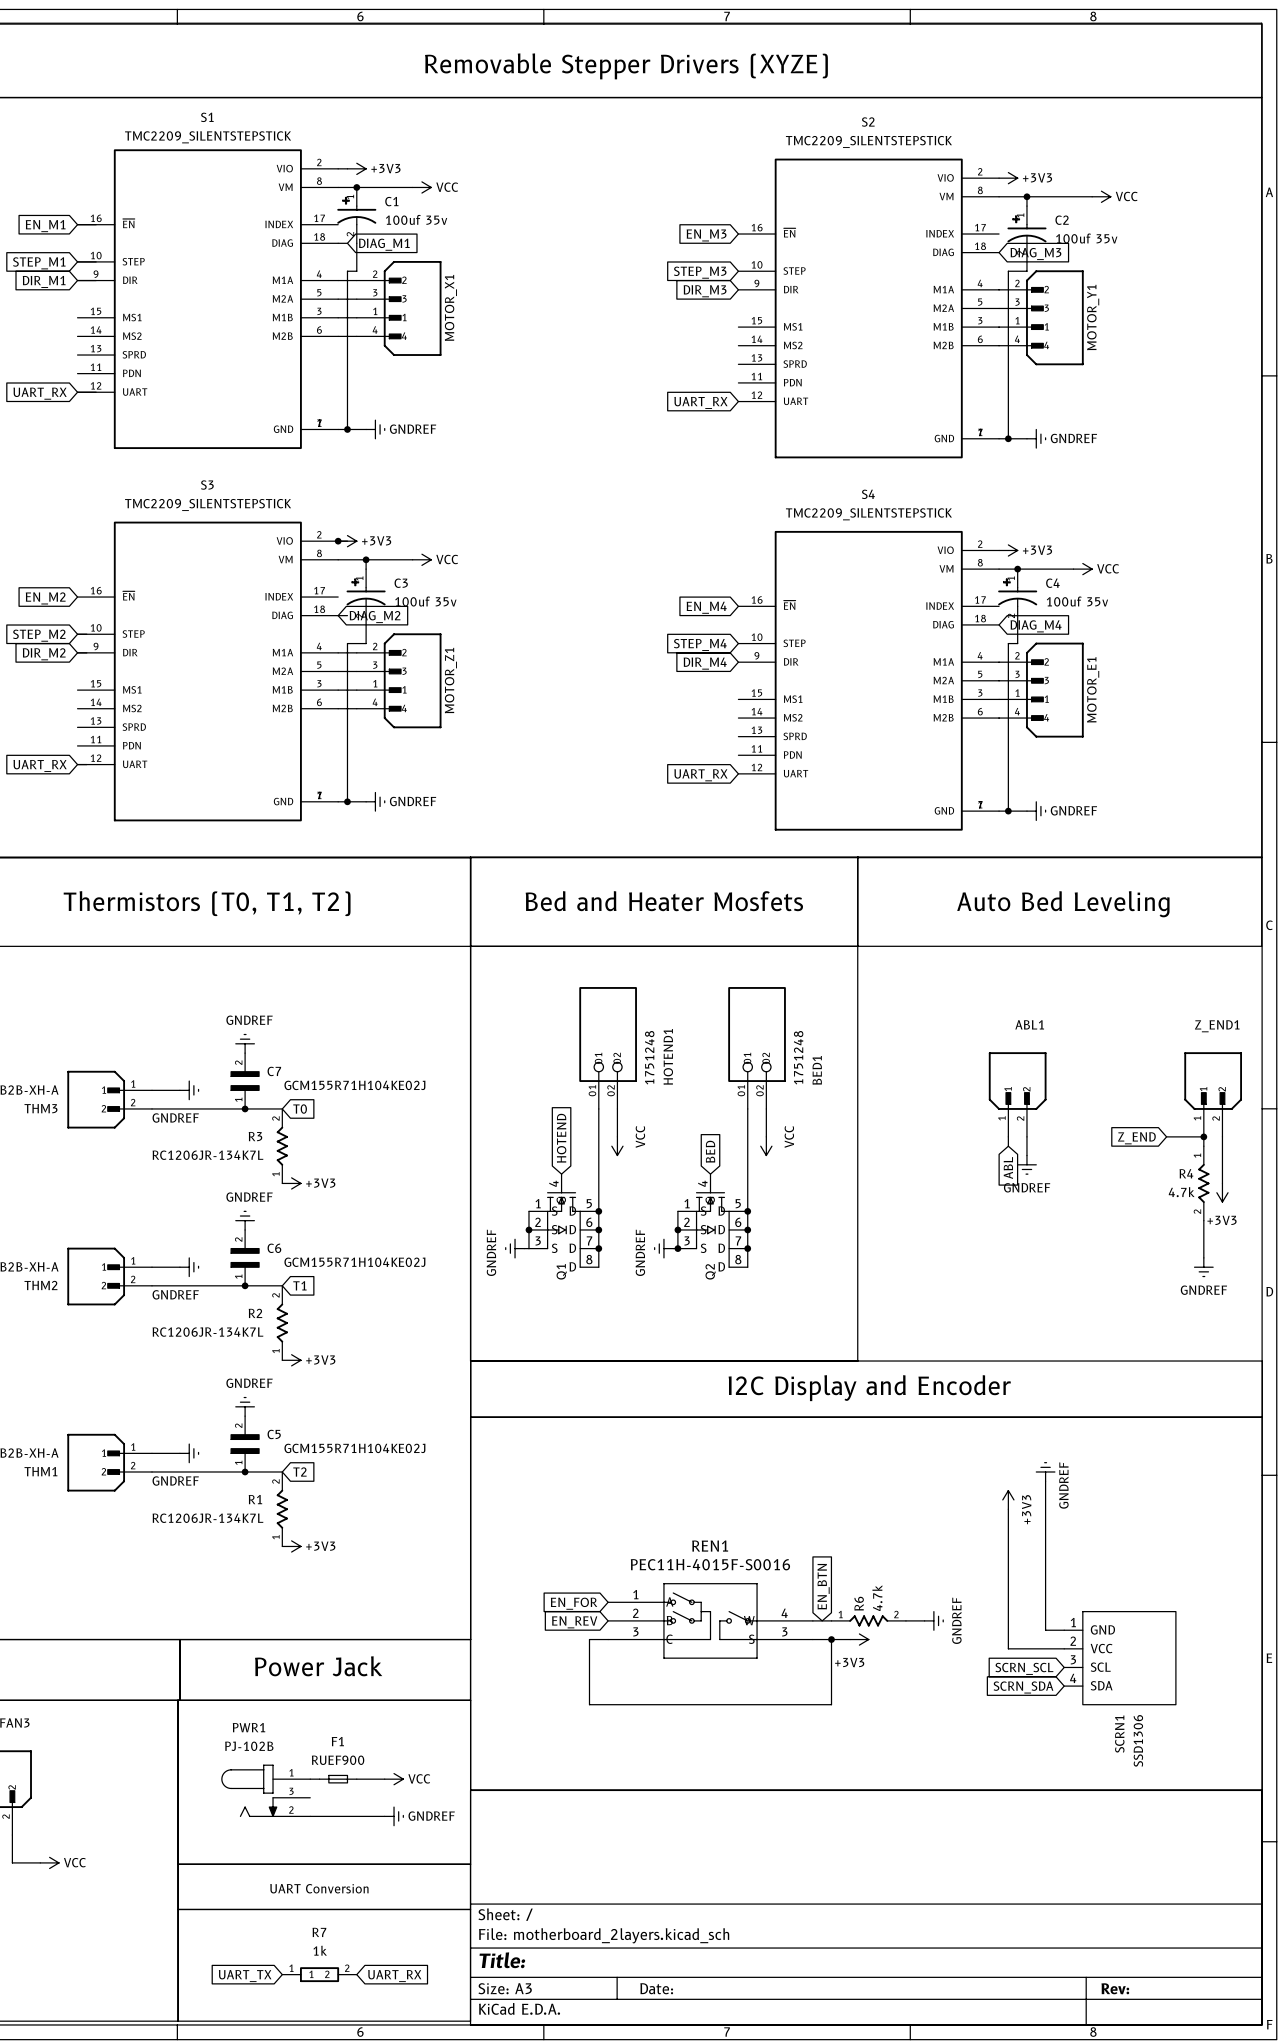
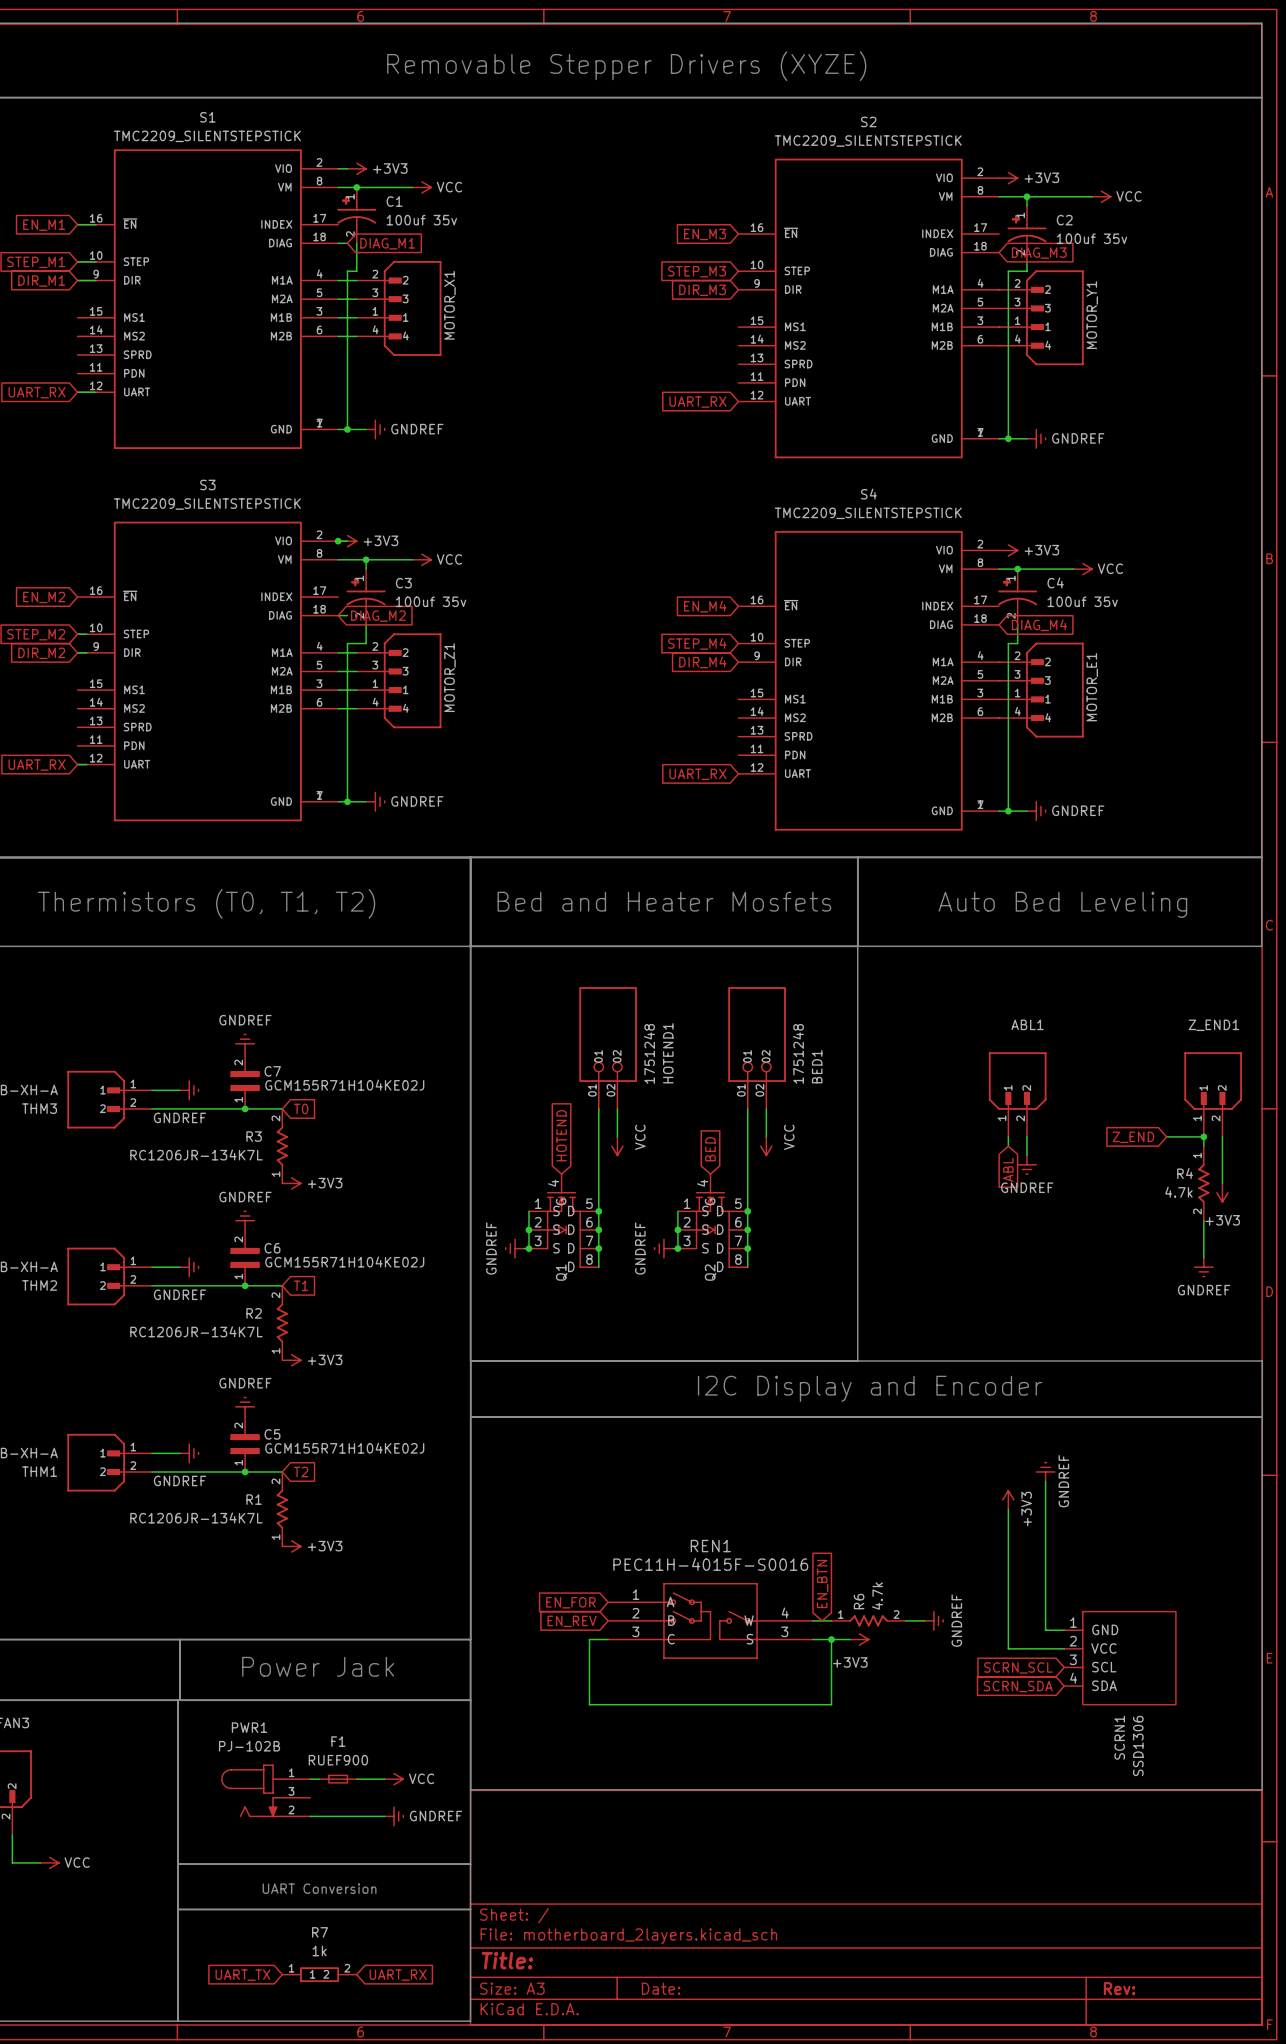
junction: none -> (528, 1248)

